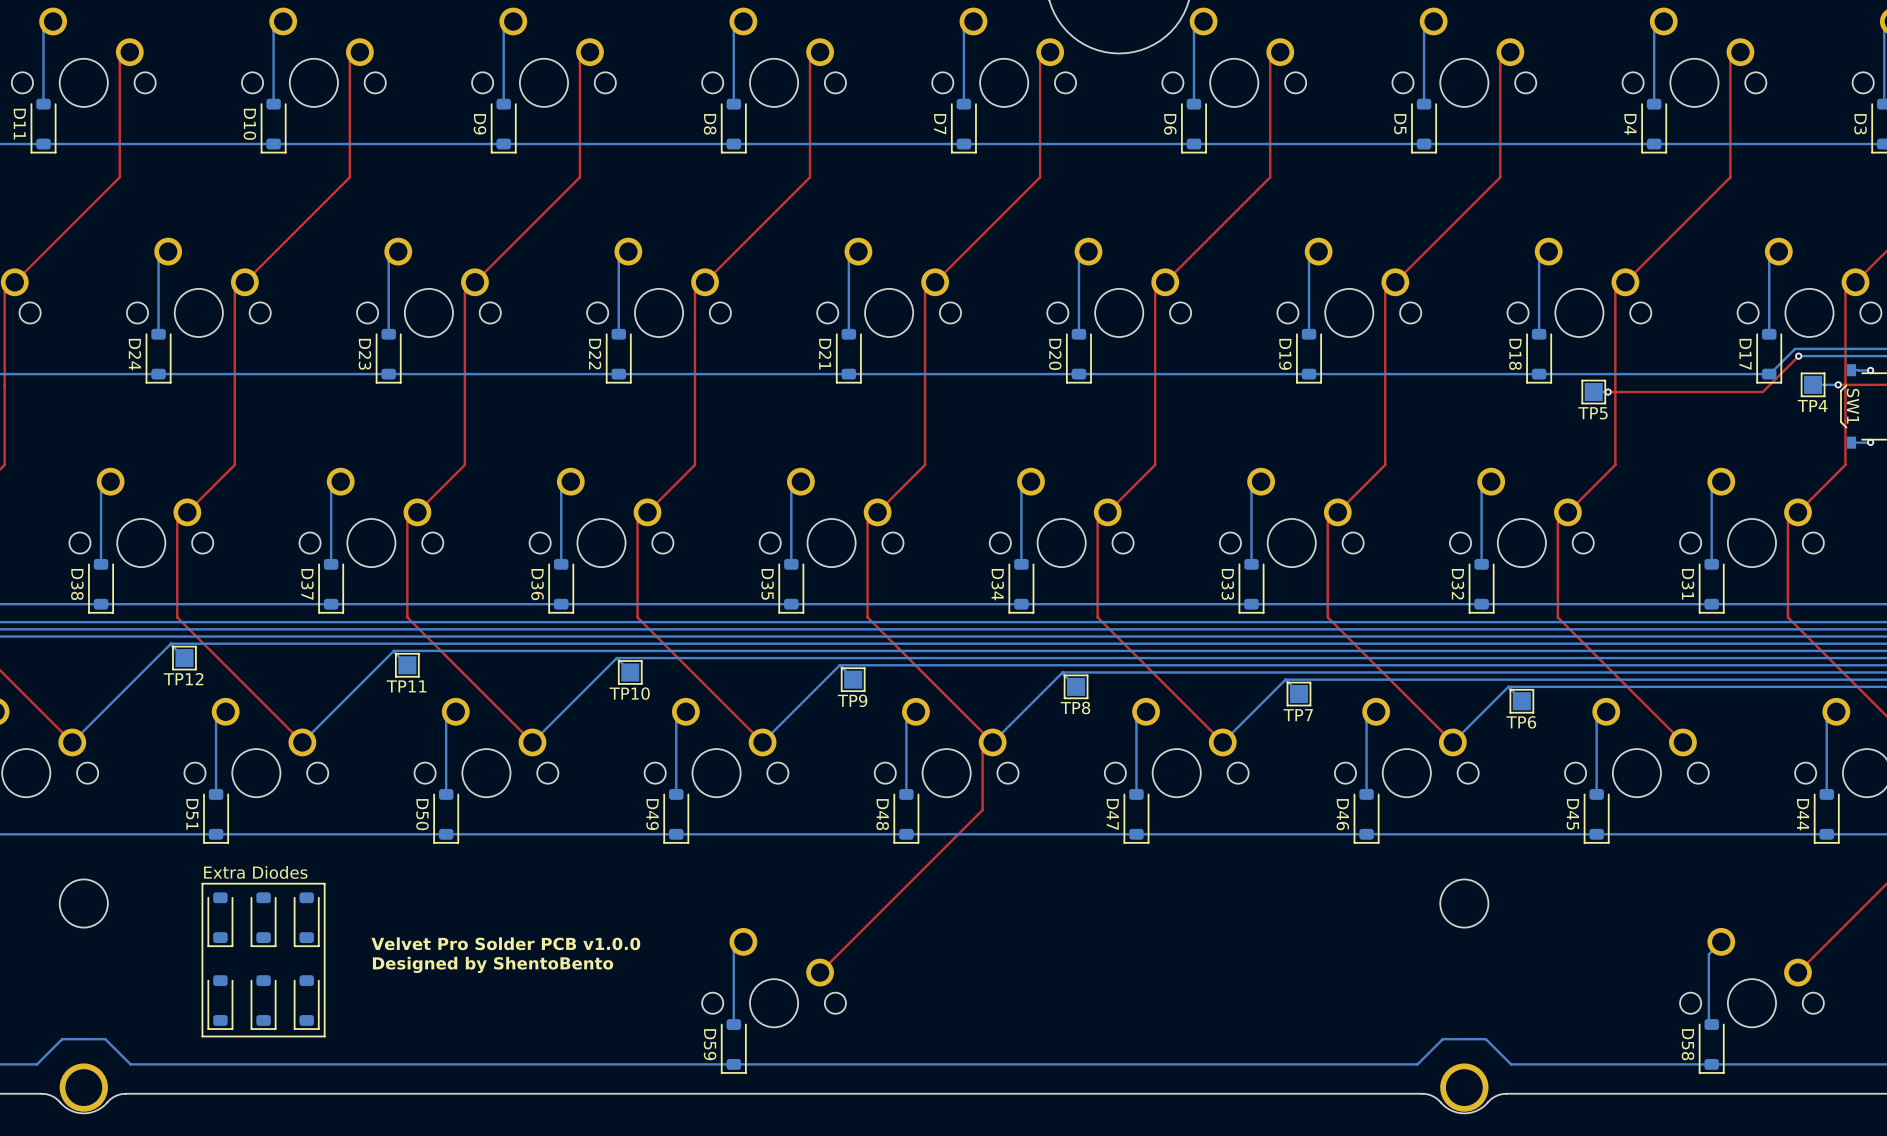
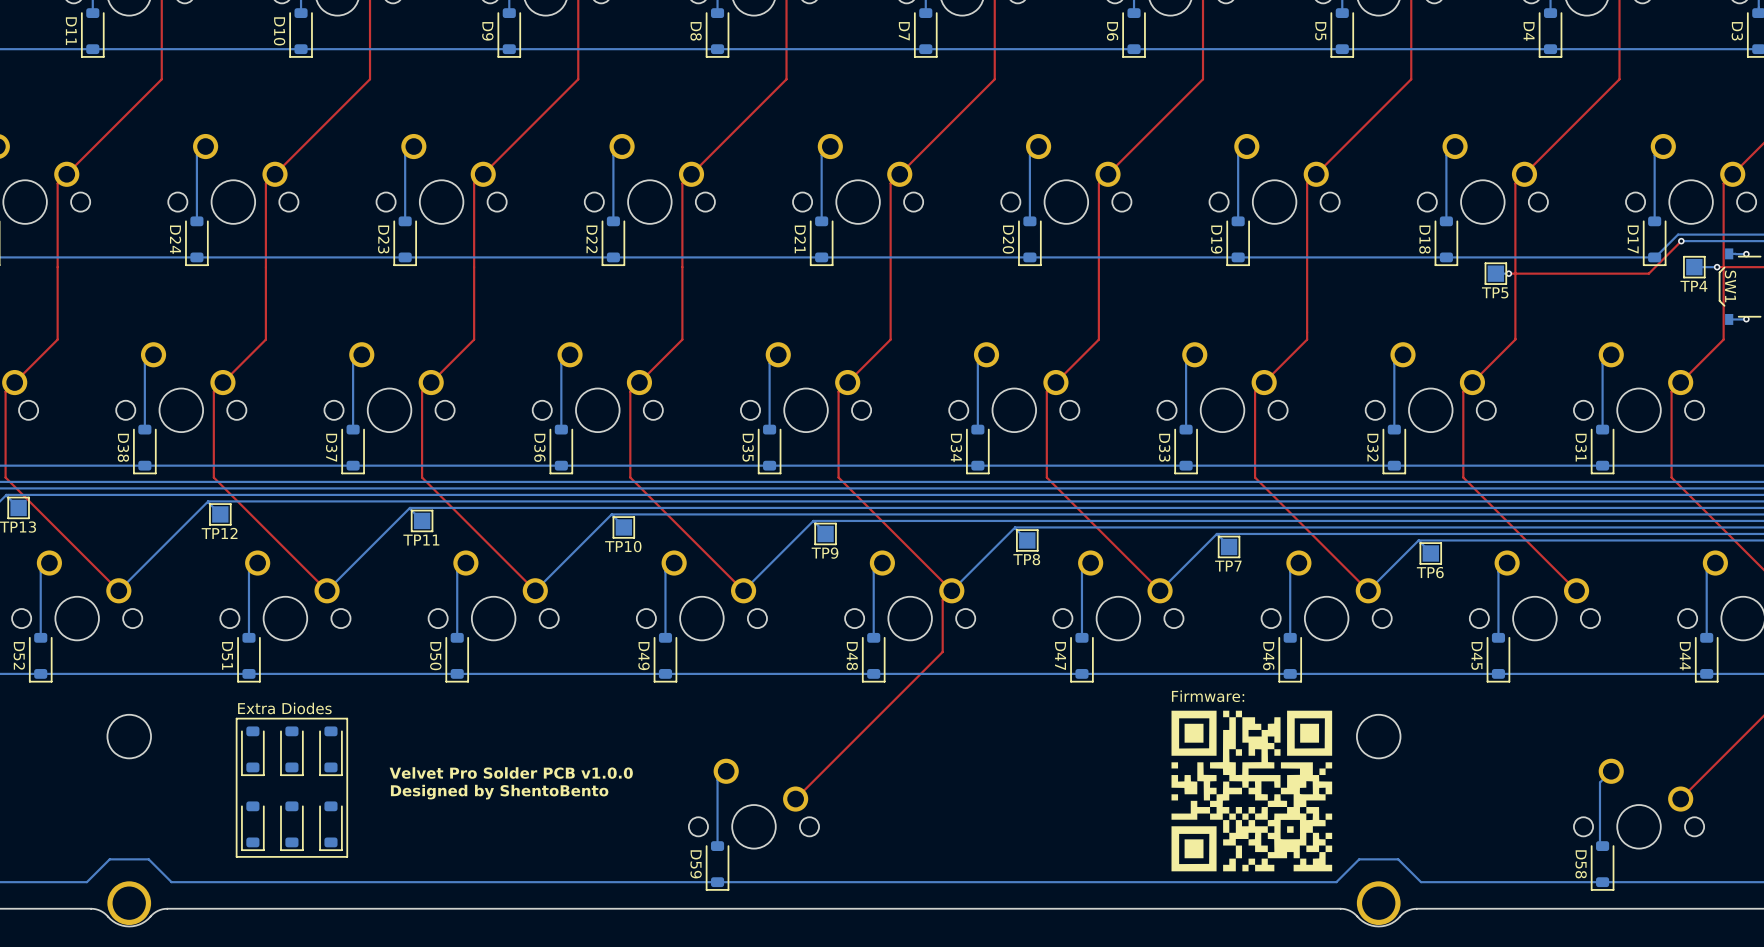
text: none -> Firmware: (1208, 696)
drawing: none -> [1171, 710, 1333, 872]

